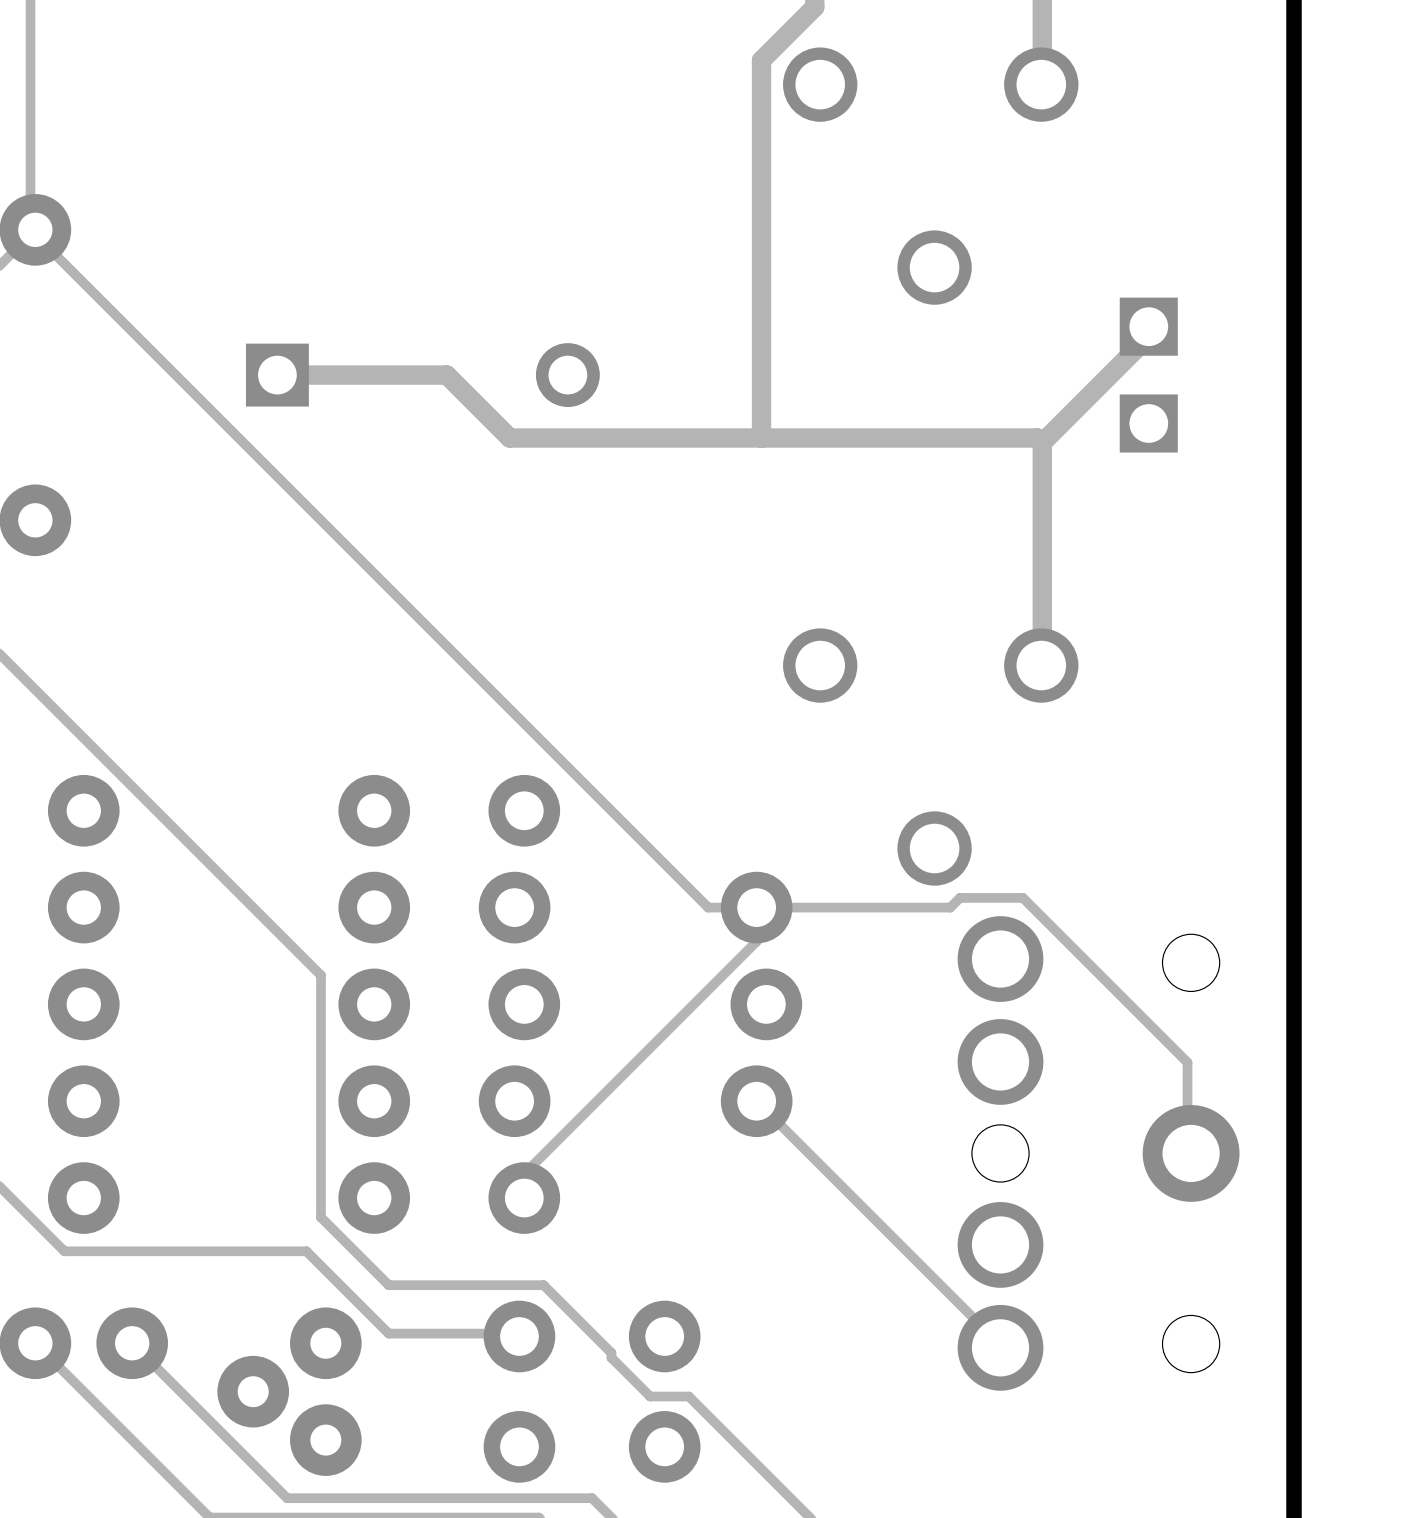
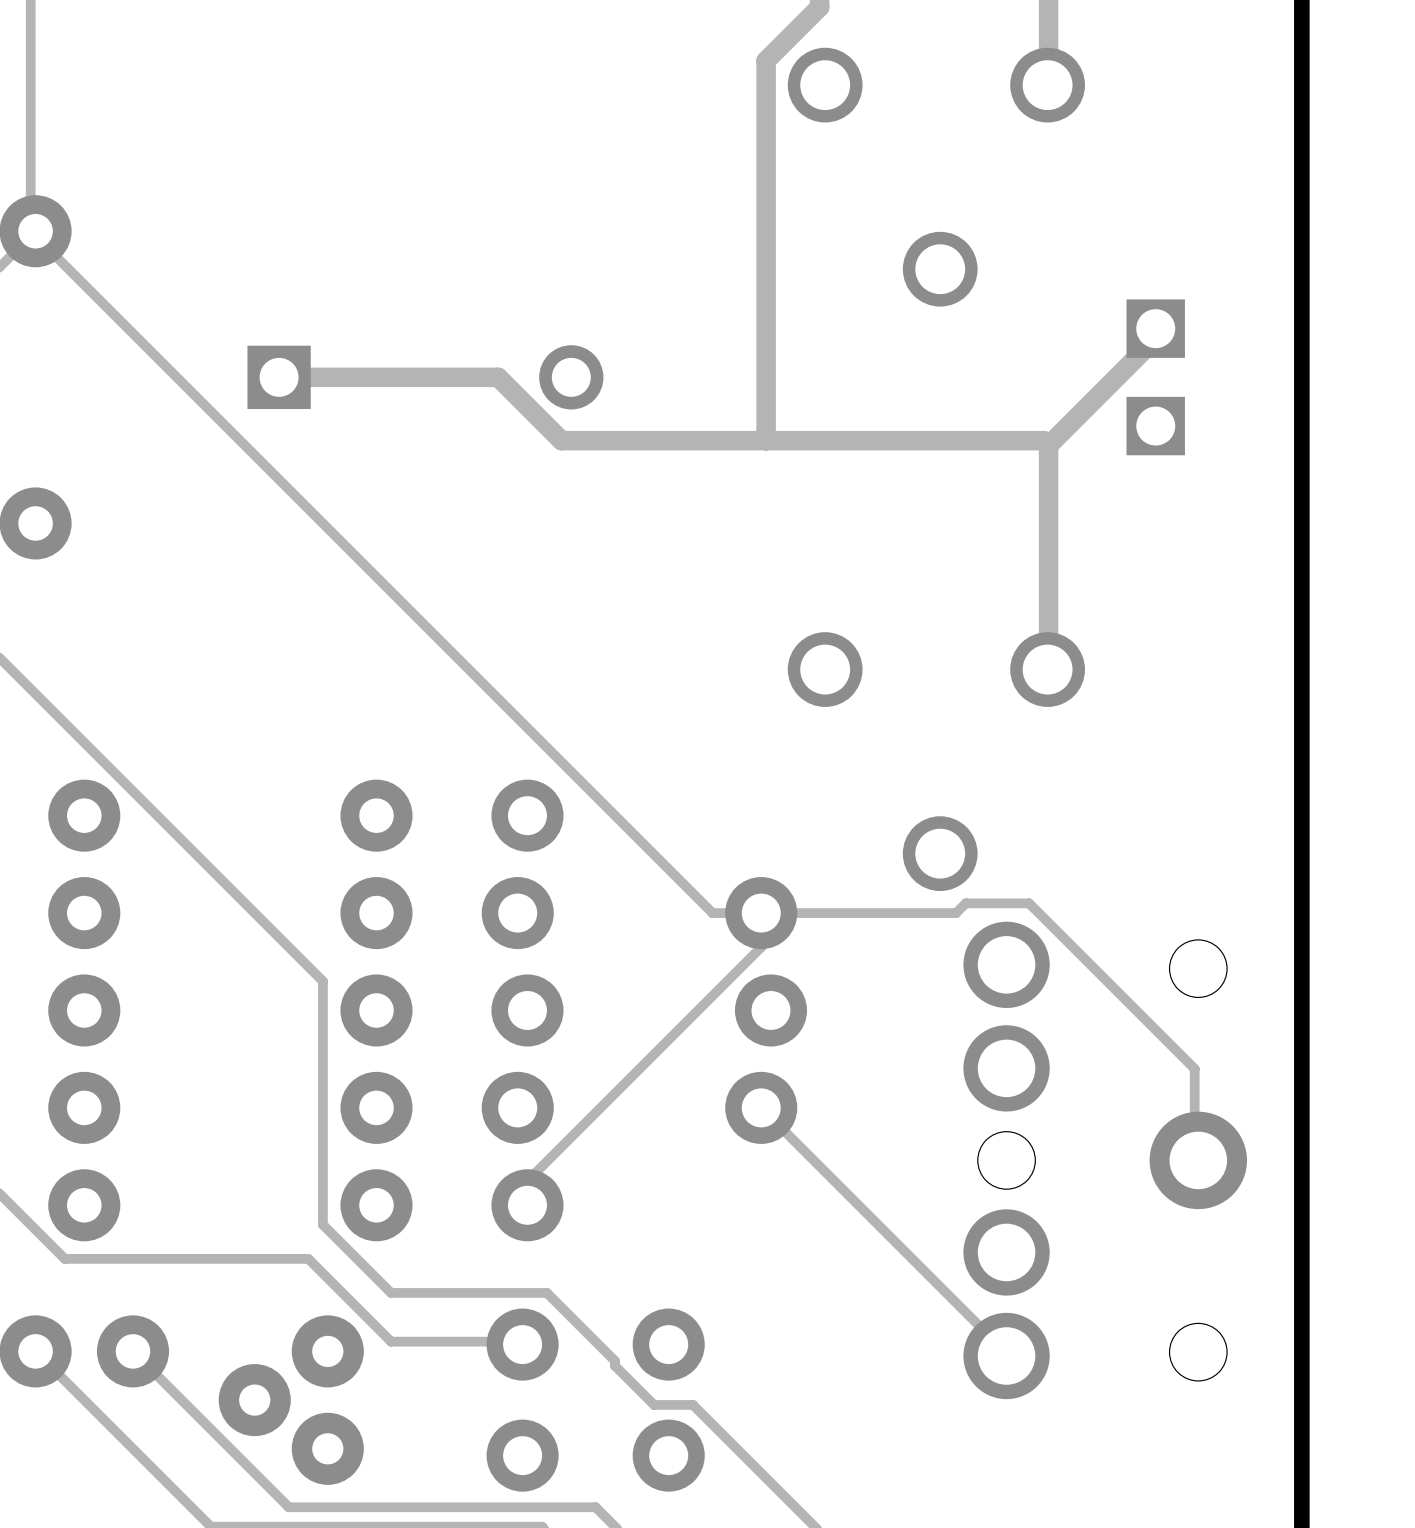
track: (446, 375) (509, 438) (558, 438) -> (449, 377) (498, 377) (561, 440)

